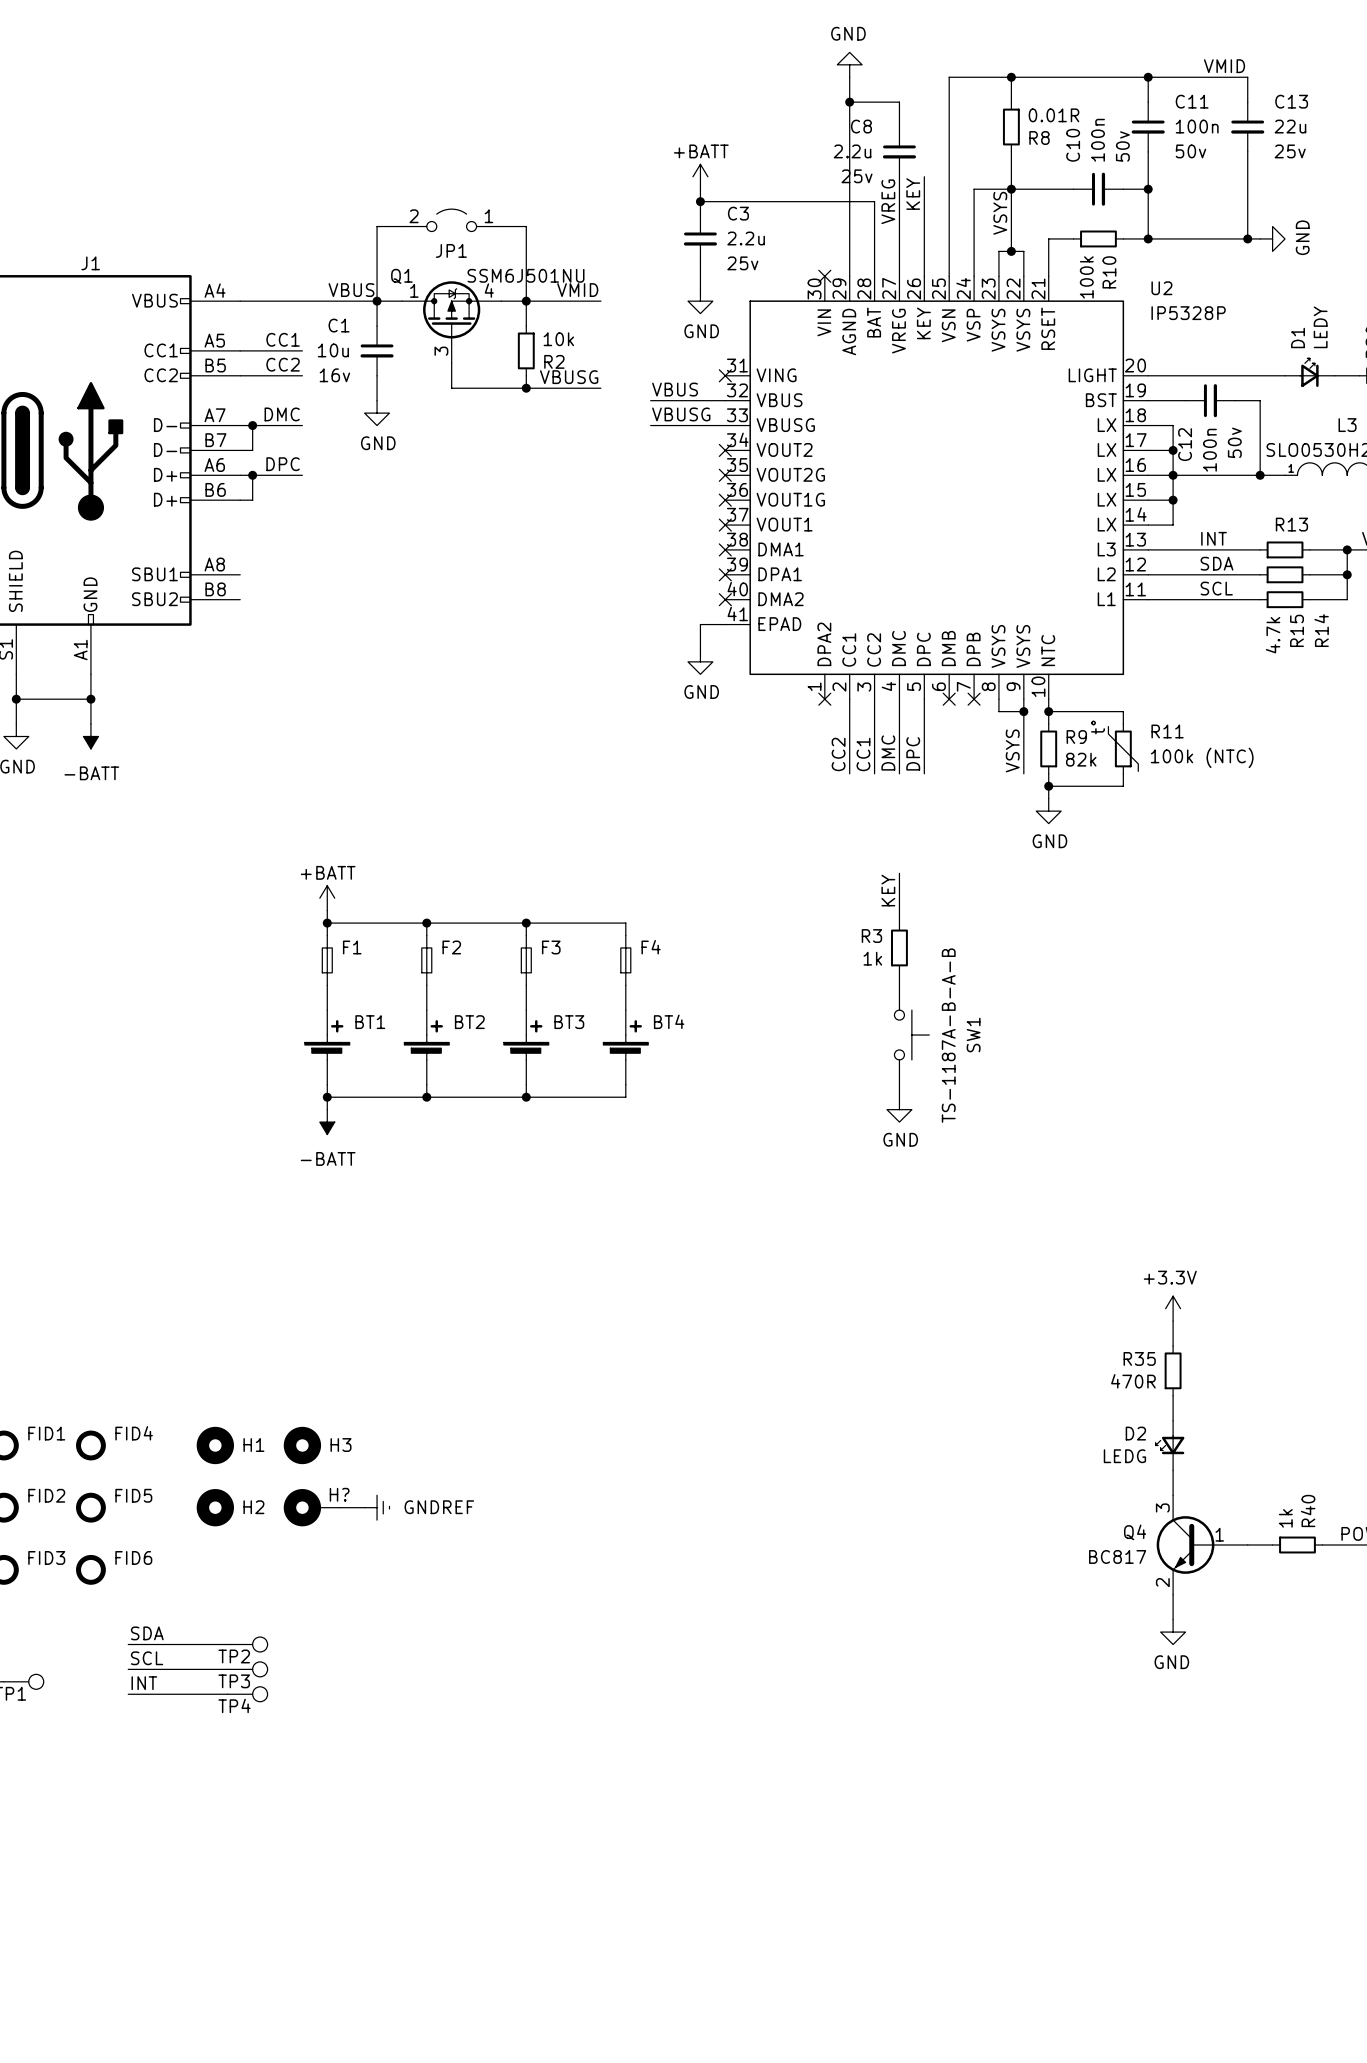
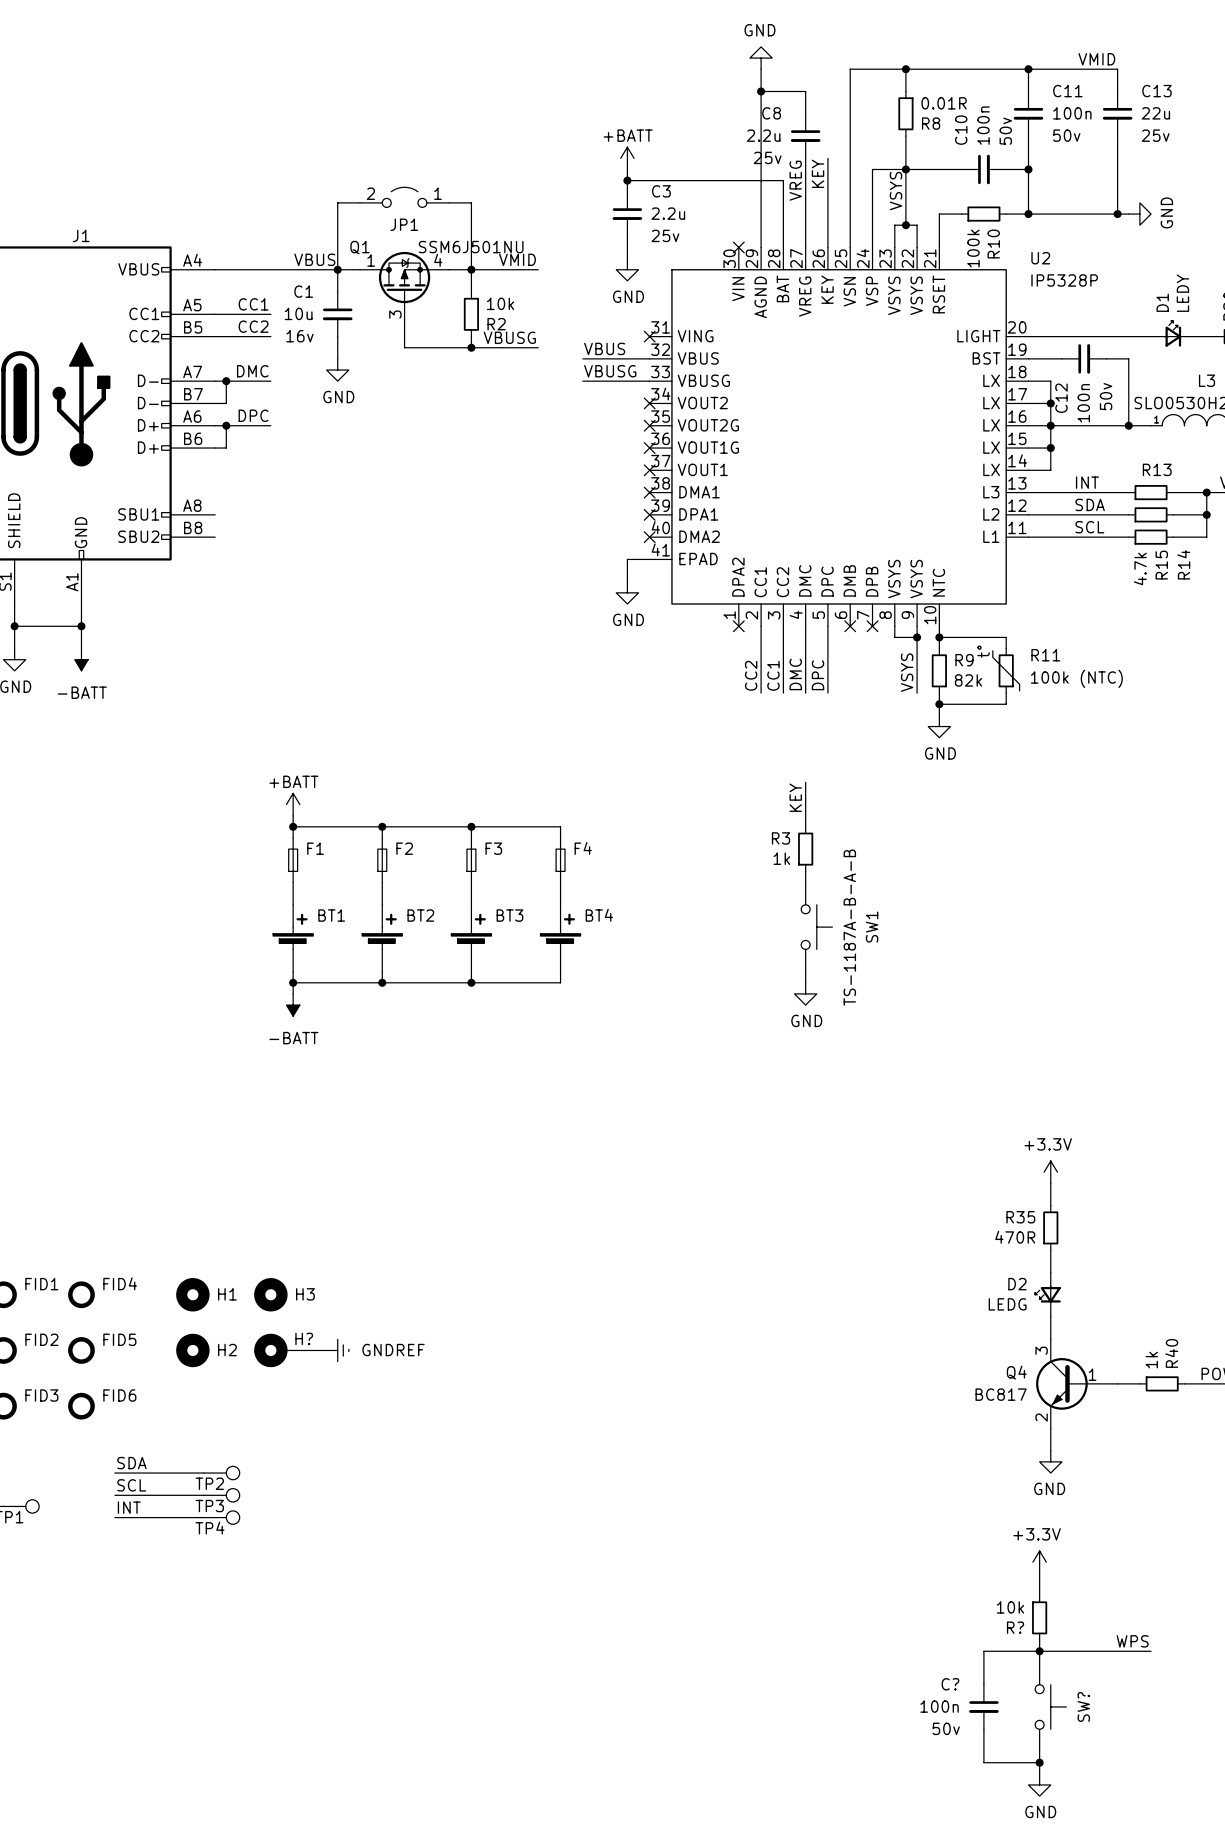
power symbol: none -> +3.3V (1039, 1562)
wire: none -> (1039, 1573) (1039, 1595)
R?: none -> 10k (1039, 1617)
wire: none -> (1039, 1640) (1039, 1662)
label: none -> WPS (1132, 1641)
junction: none -> (1039, 1651)
wire: none -> (1151, 1651) (983, 1651) (983, 1684)
C?: none -> 100n (983, 1706)
SW?: none -> (1050, 1706)
wire: none -> (983, 1729) (983, 1762) (1039, 1762)
wire: none -> (1039, 1751) (1039, 1773)
junction: none -> (1039, 1762)
power symbol: none -> GND (1039, 1784)

